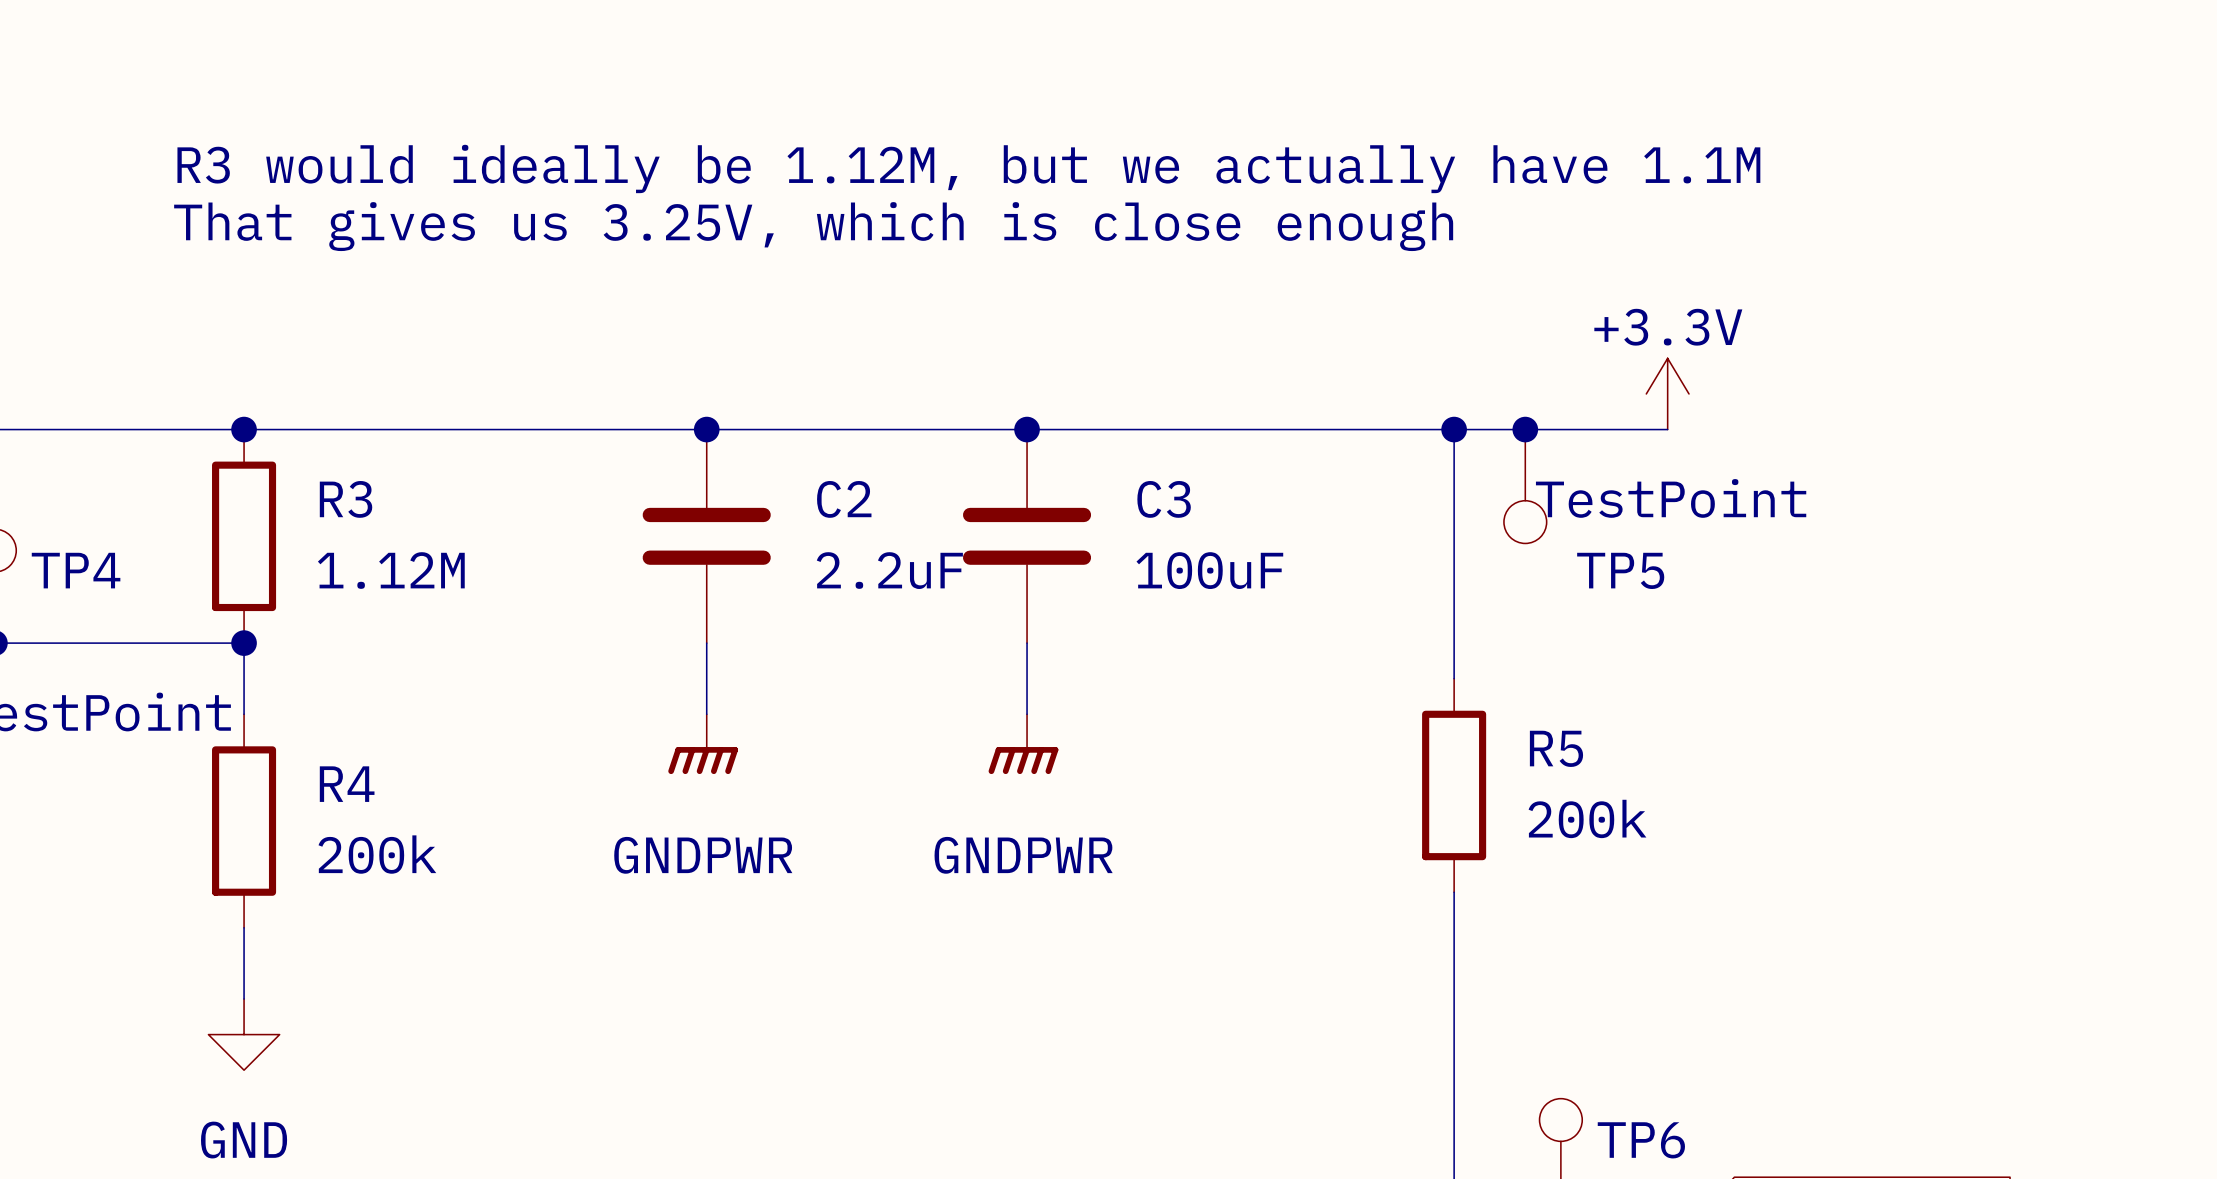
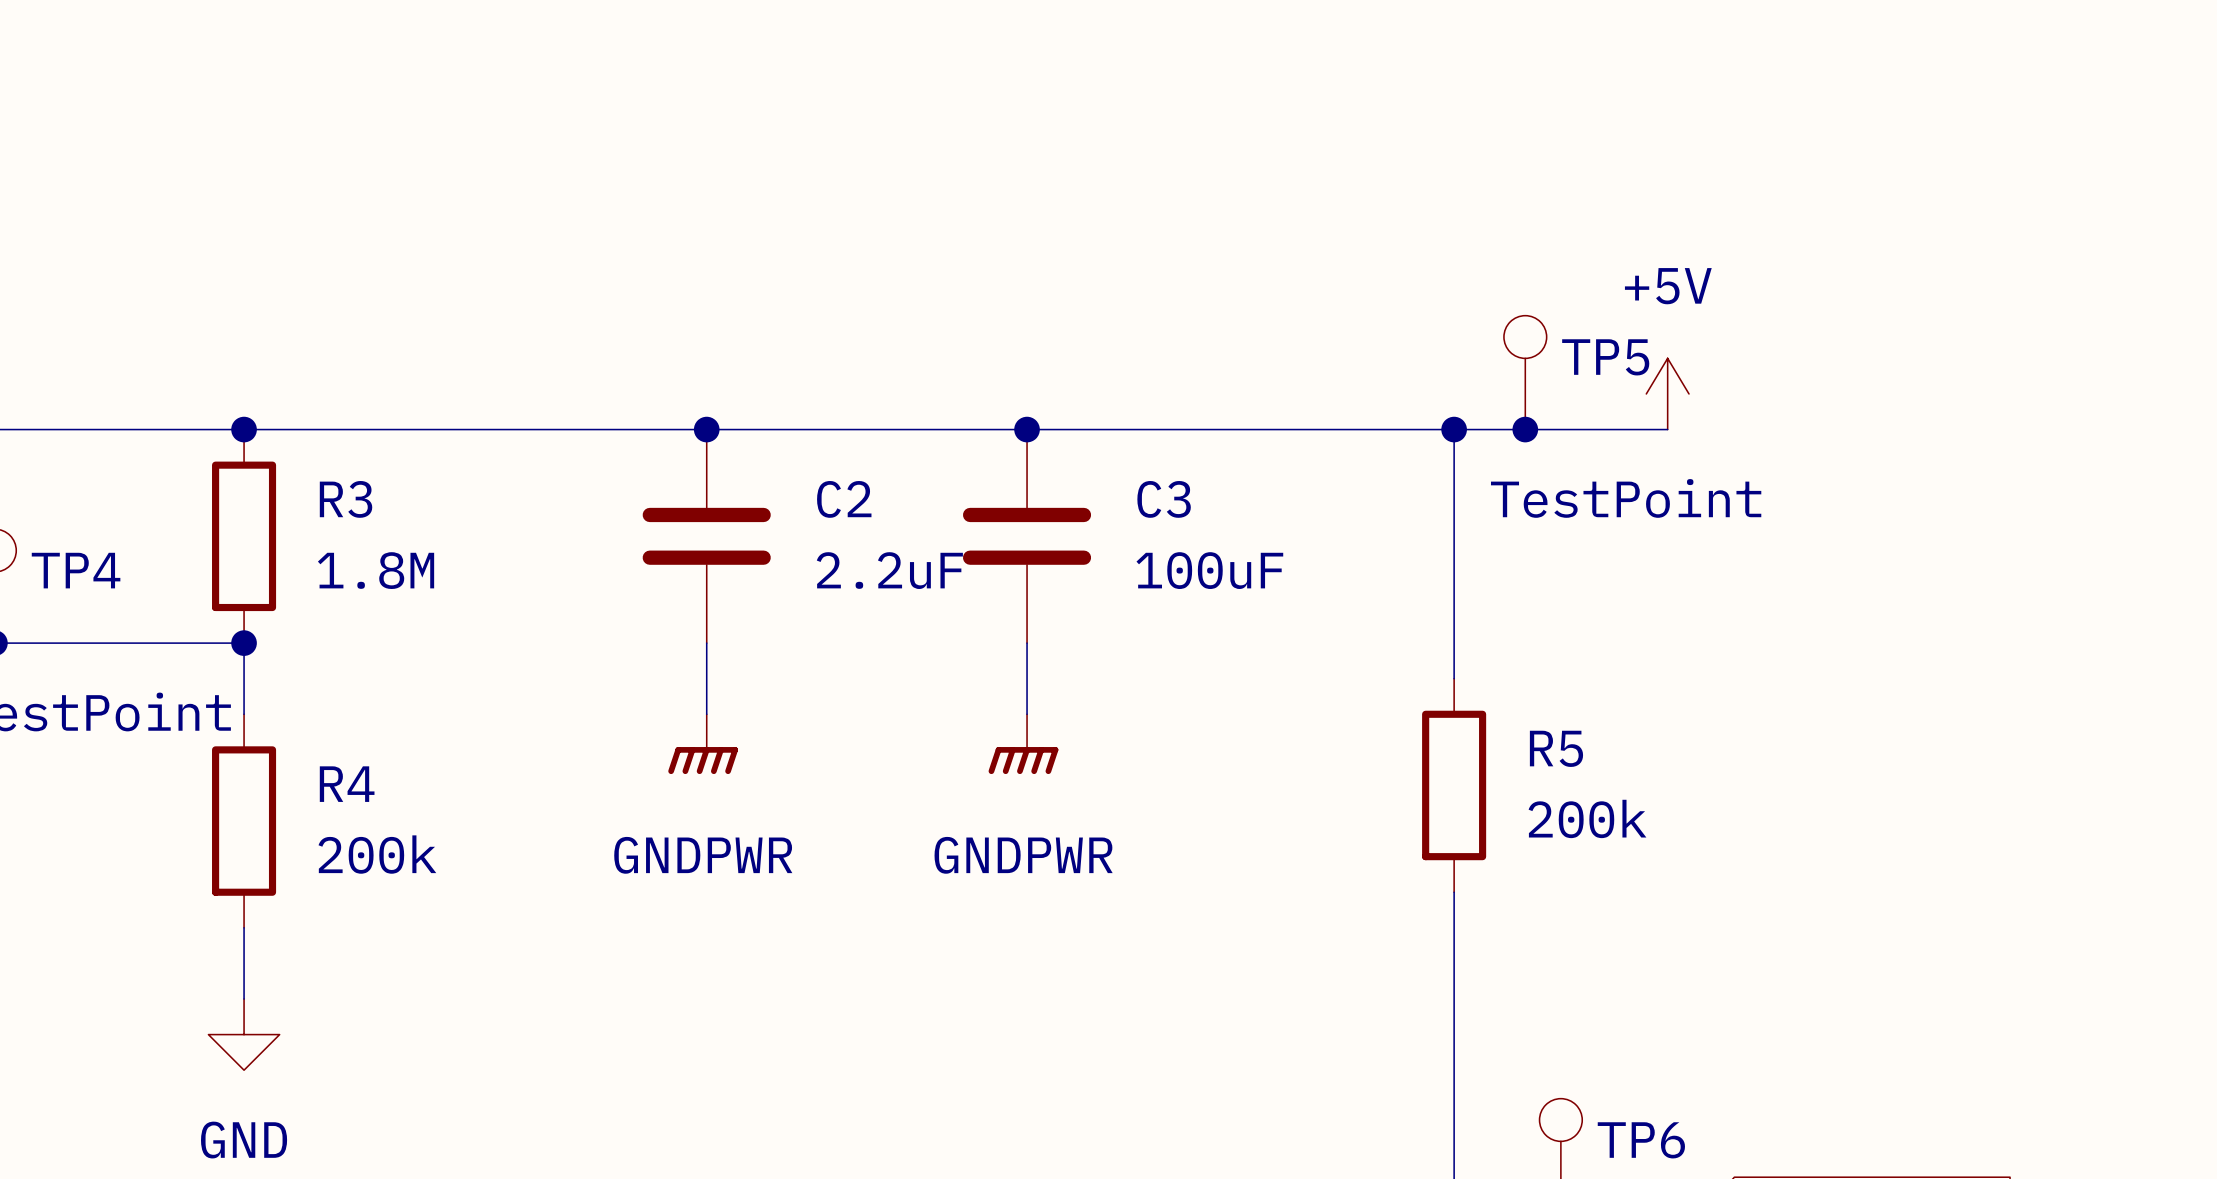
text: R3 would ideally be 1.12M, but we actually have 1.1M (968, 168) -> none
text: That gives us 3.25V, which is close enough (813, 226) -> none
power symbol: +3.3V (1667, 393) -> +5V (1667, 393)
TP5 position: (1525, 486) -> (1525, 372)
TP5 value position: TestPoint (1671, 498) -> TestPoint (1626, 498)
TP5 rotation: 0° (1525, 522) -> 180° (1525, 337)
R3 value: 1.12M (391, 570) -> 1.8M (376, 570)
TP5 name position: TP5 (1620, 570) -> TP5 (1605, 357)

